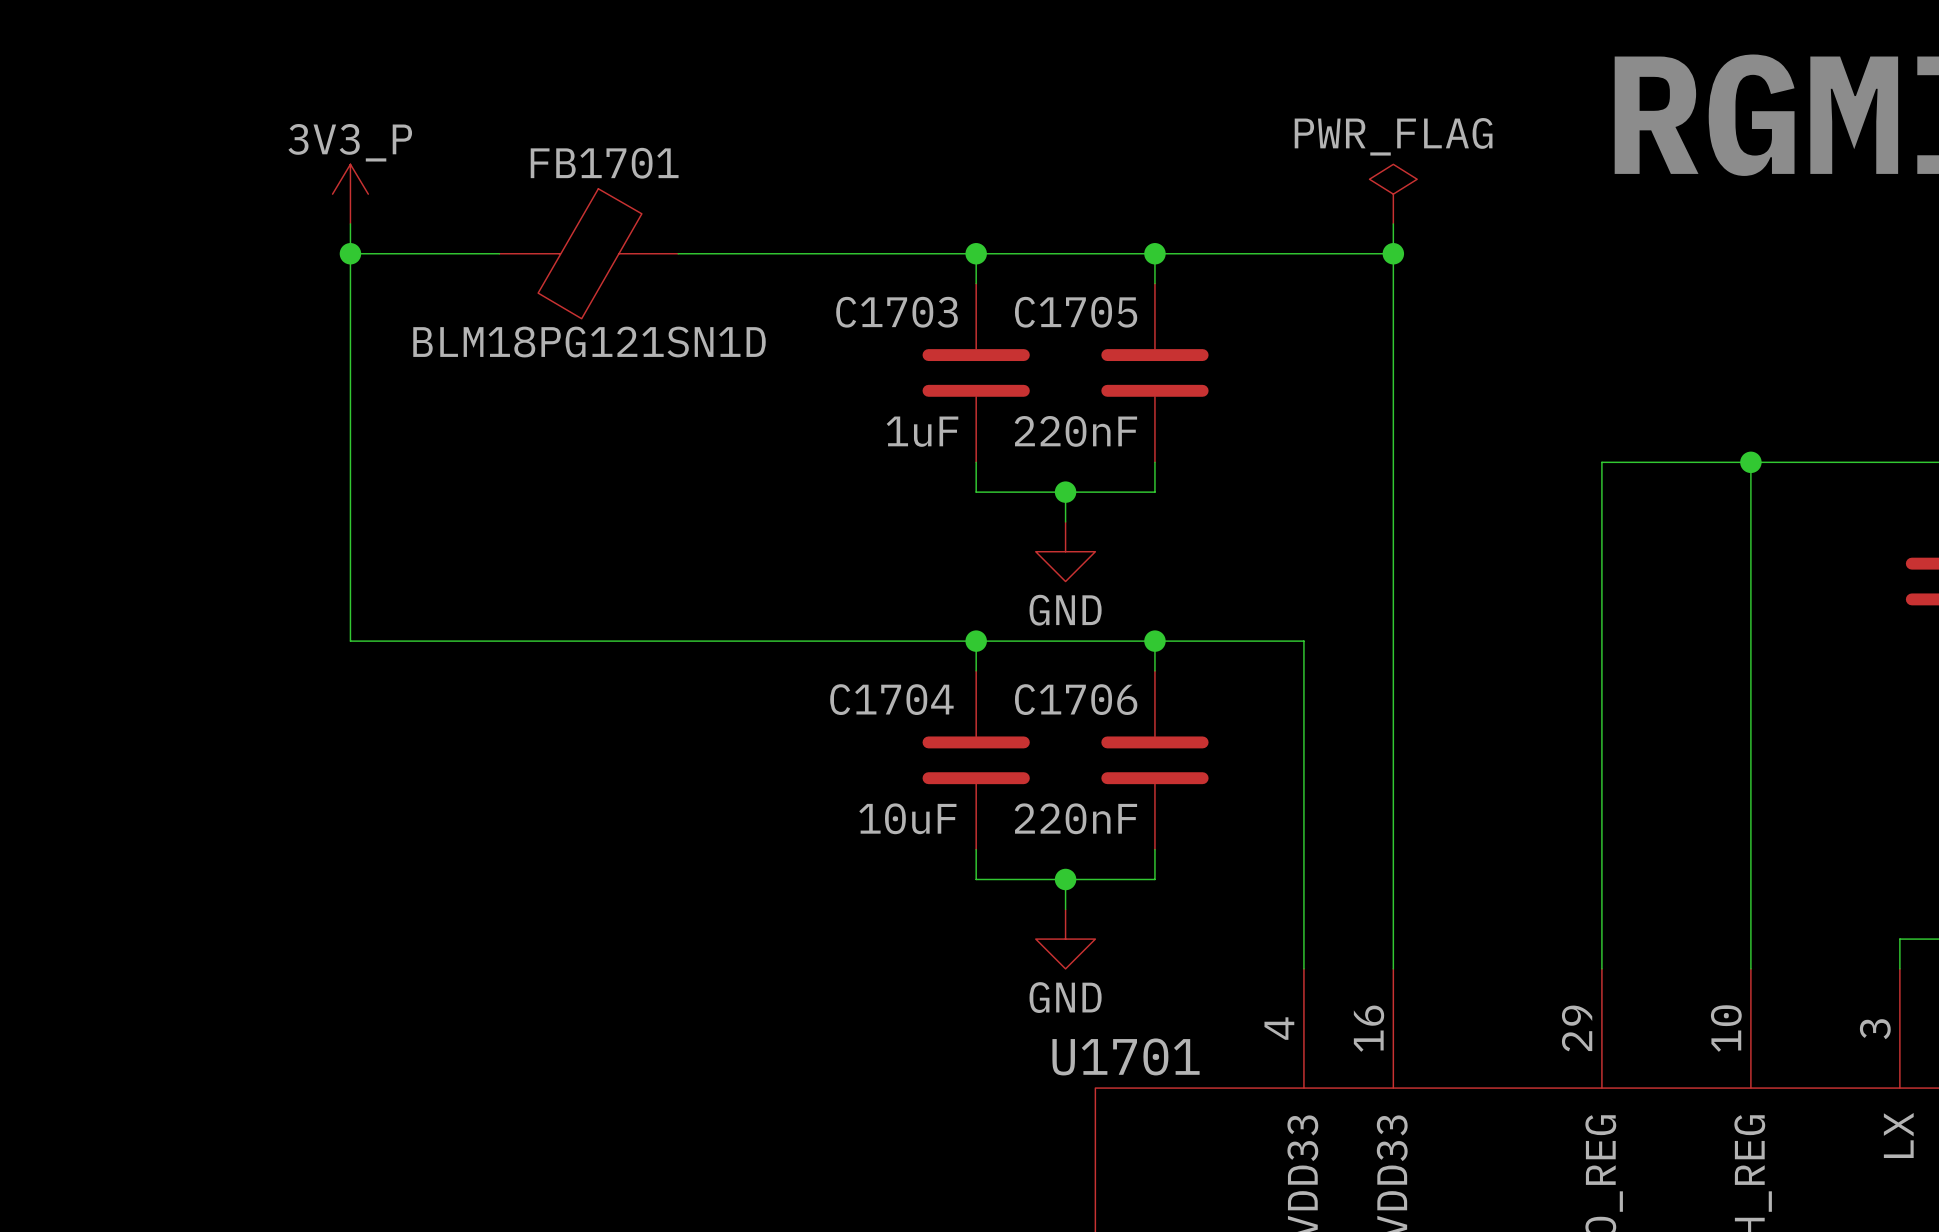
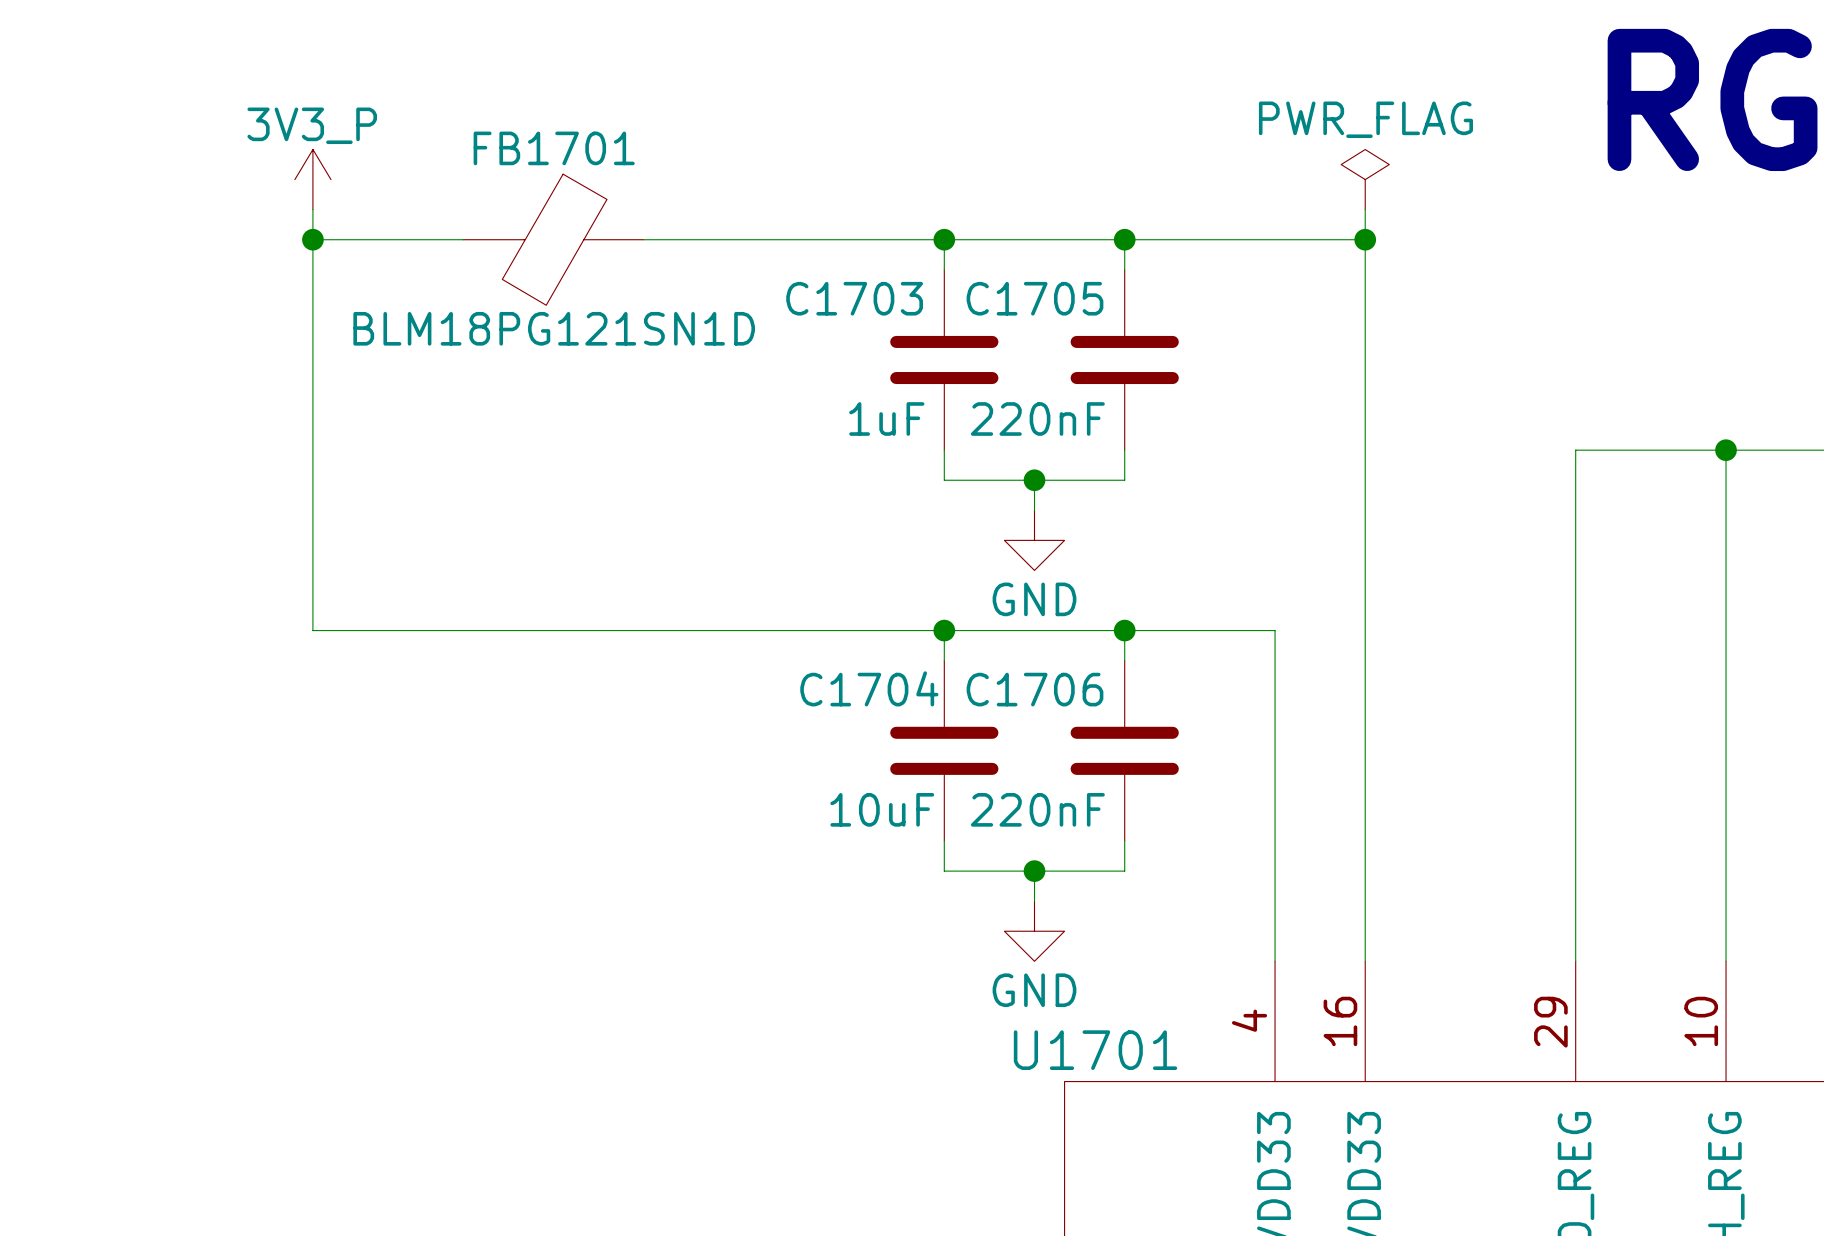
FB1701 name position: FB1701 (604, 163) -> FB1701 (554, 148)

